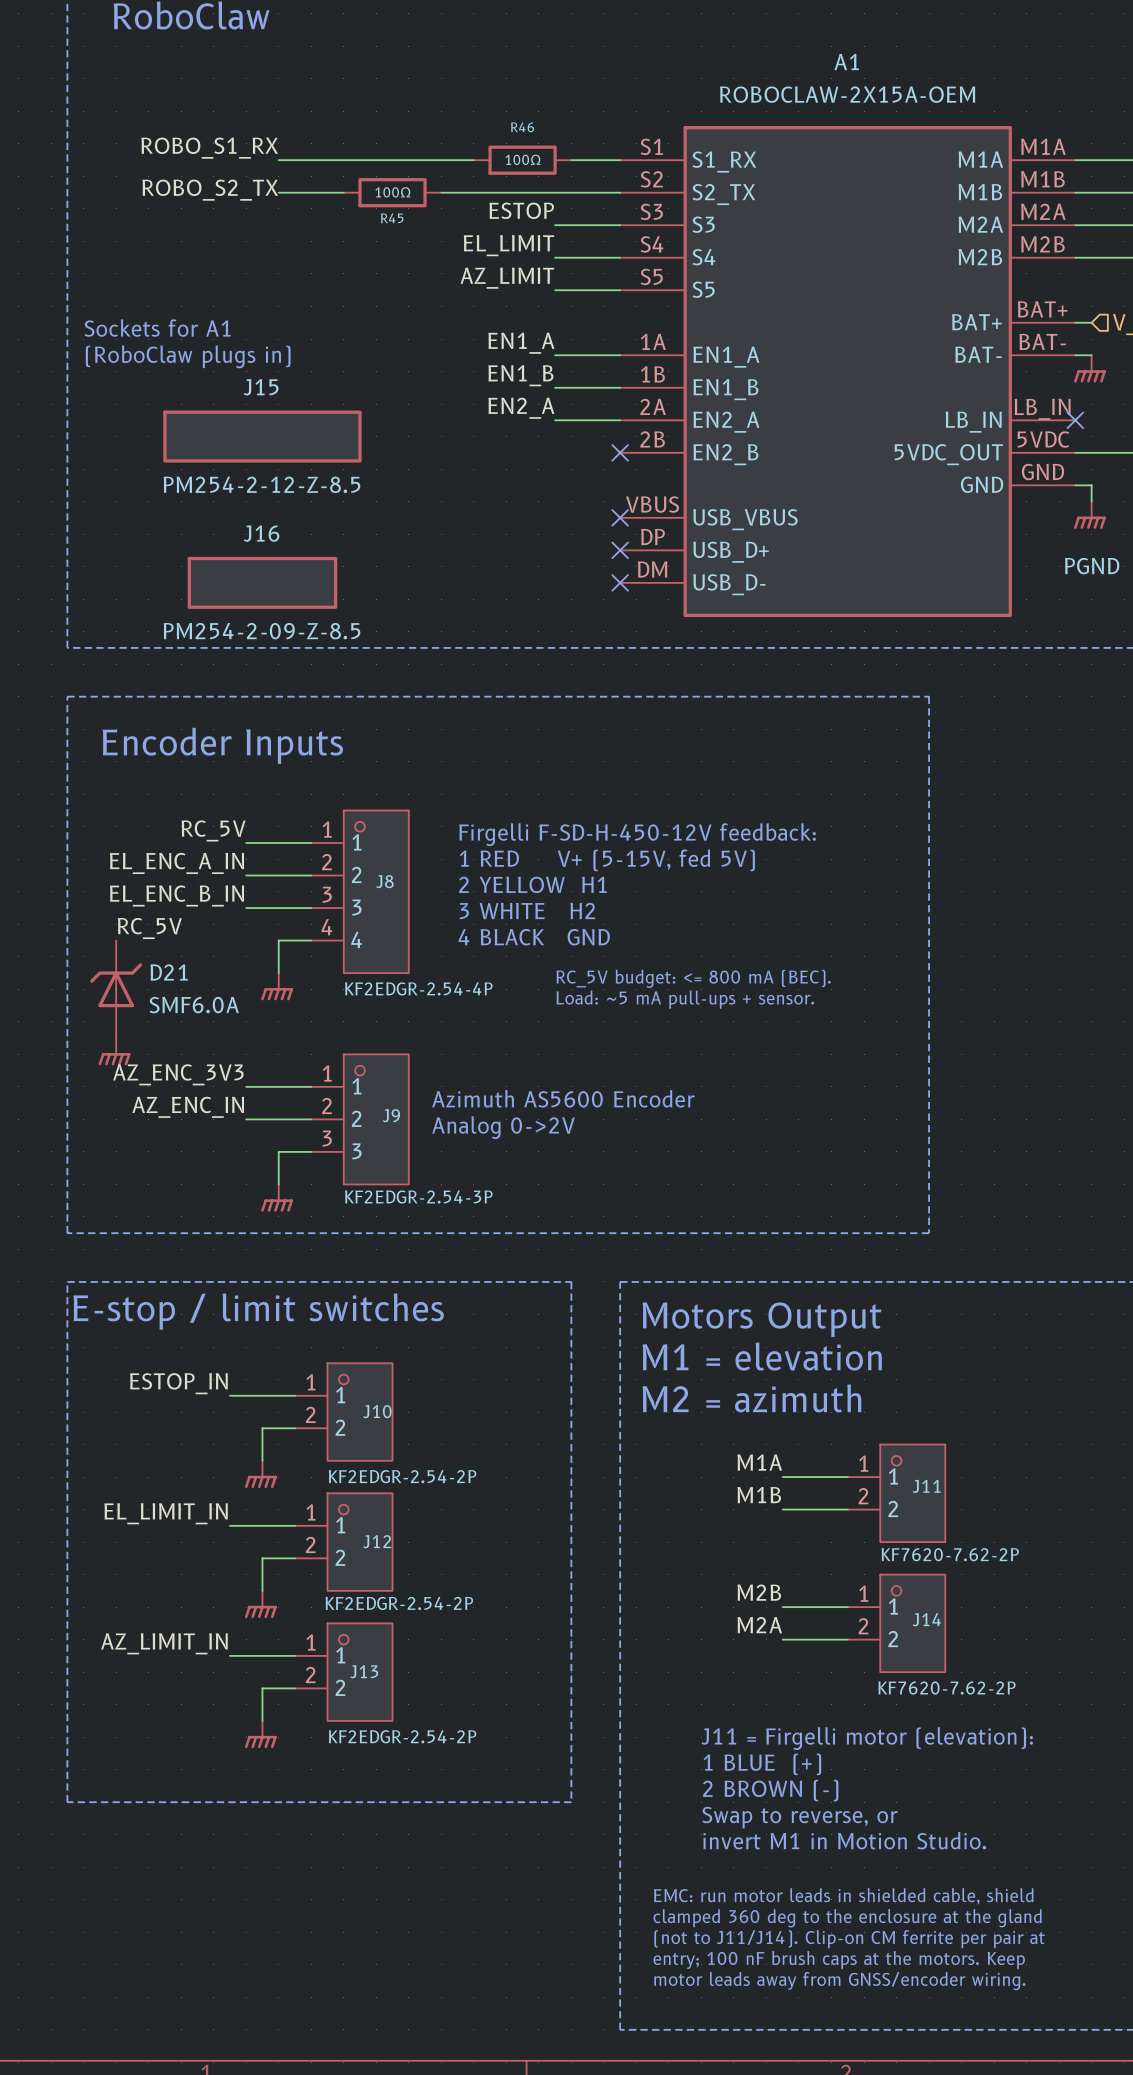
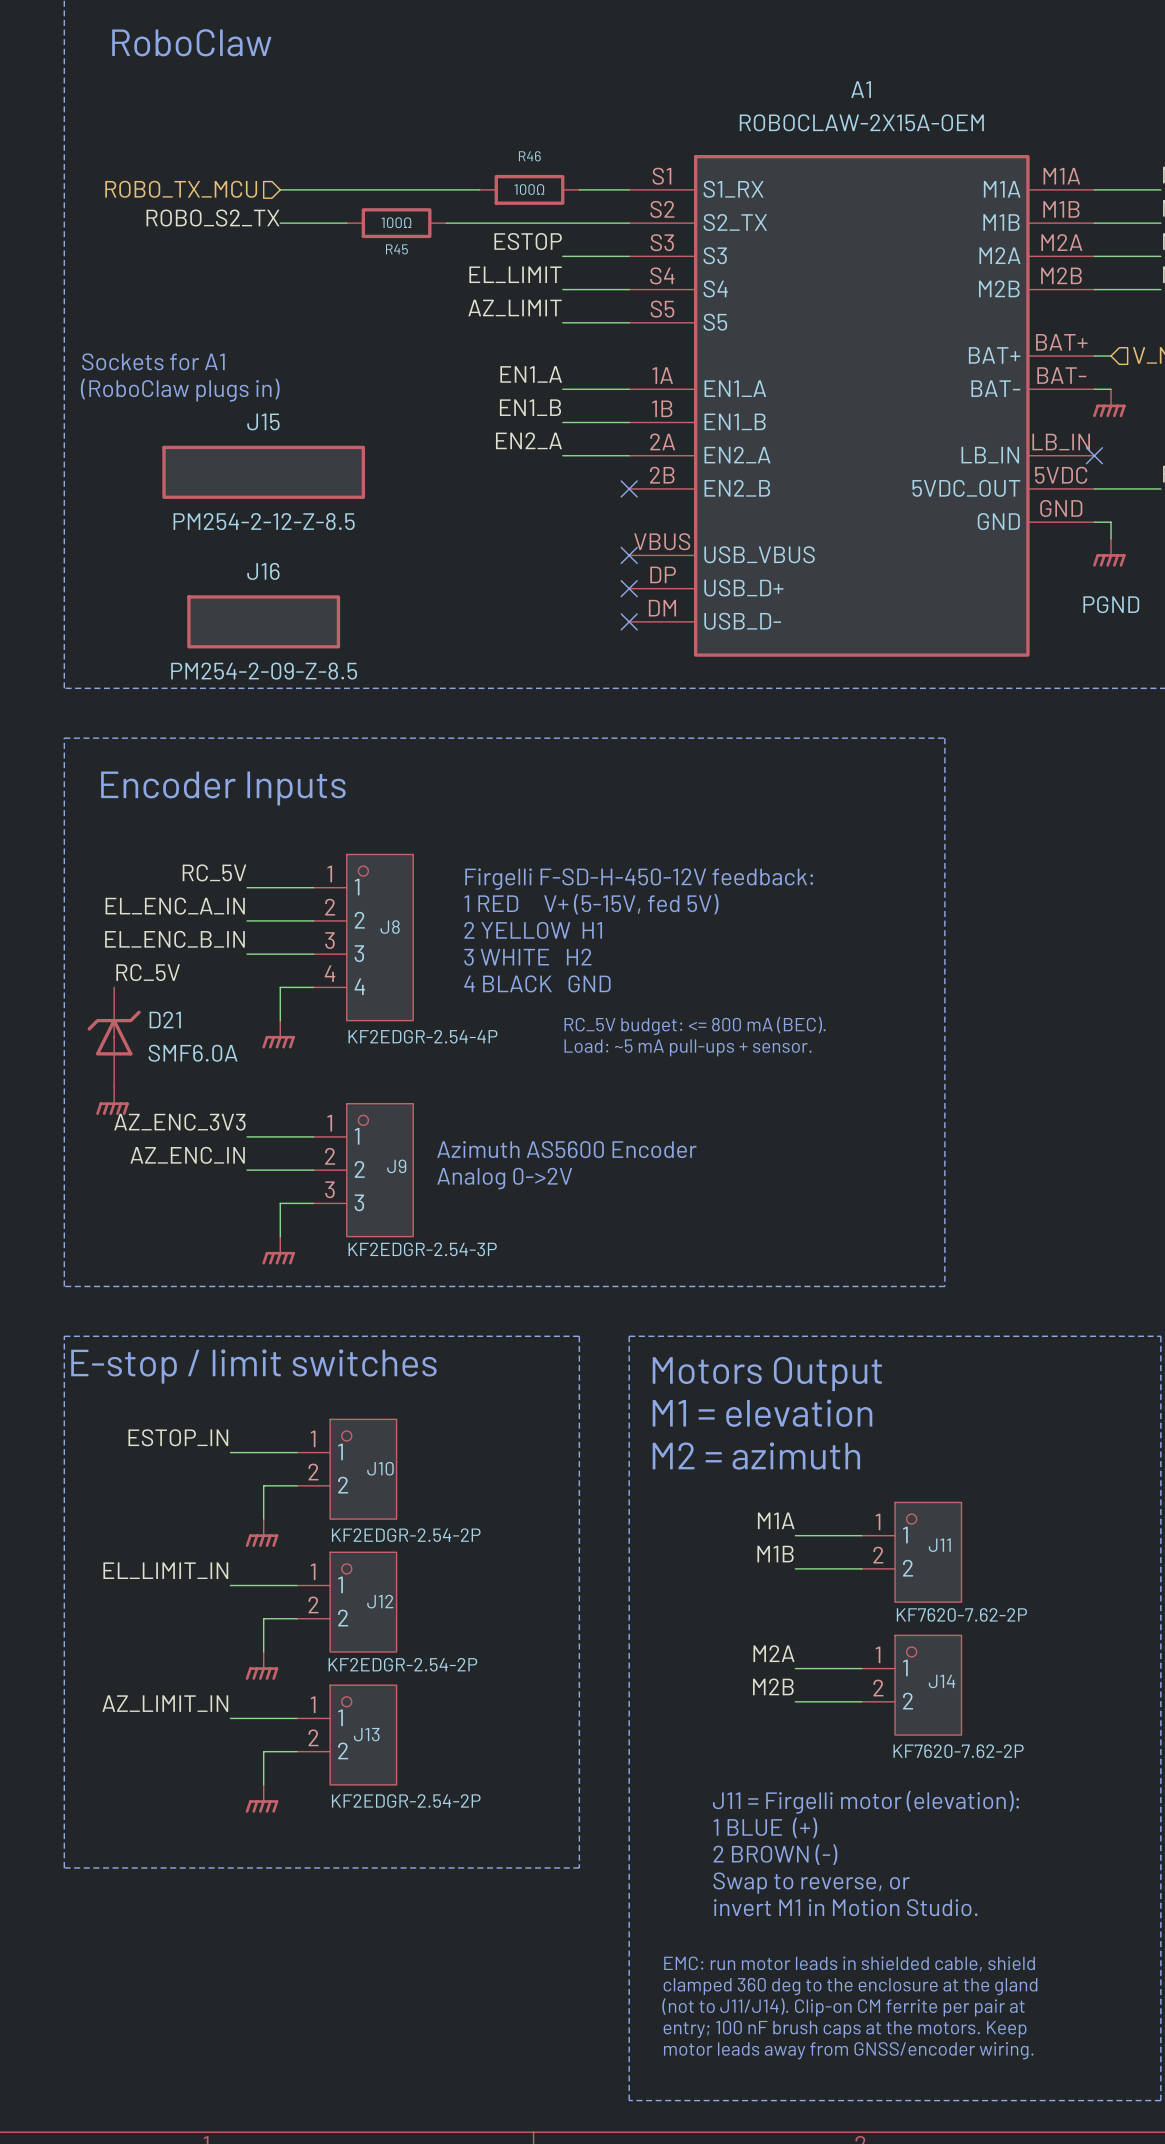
label: ROBO_S1_RX (209, 148) -> none
hierarchical label: none -> ROBO_TX_MCU (181, 189)
label: M2B (759, 1592) -> M2A (774, 1653)
label: M2A (759, 1625) -> M2B (773, 1686)

